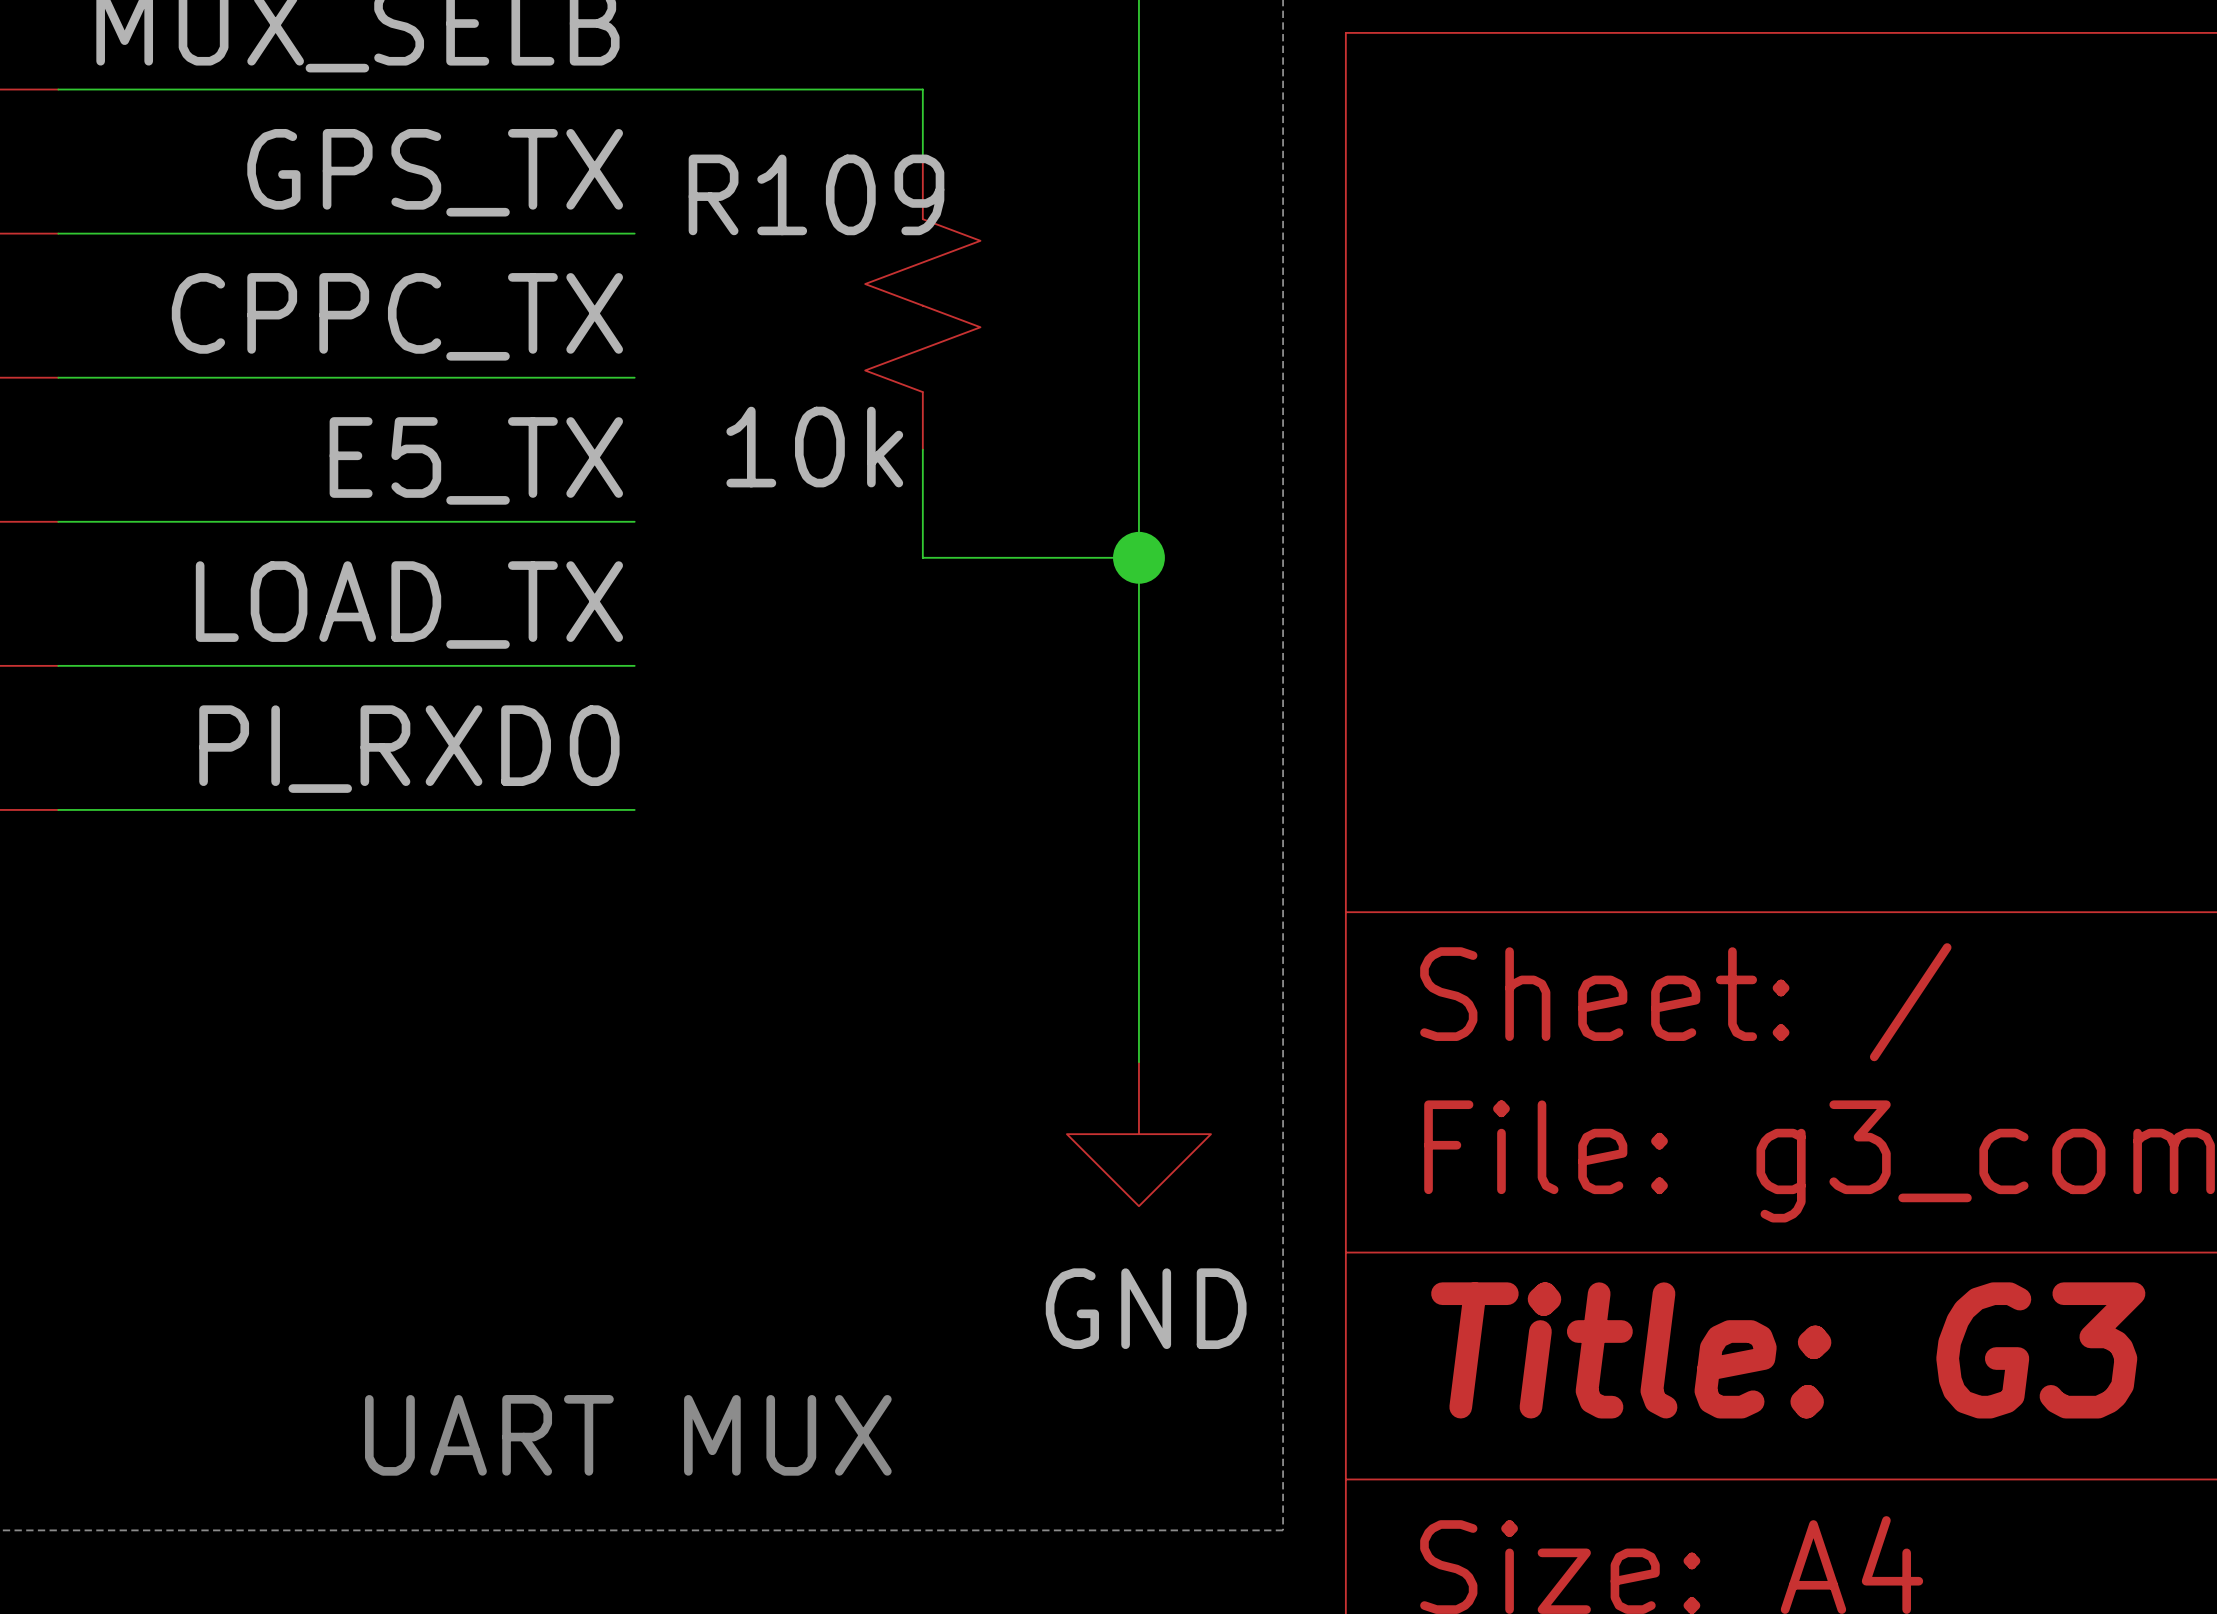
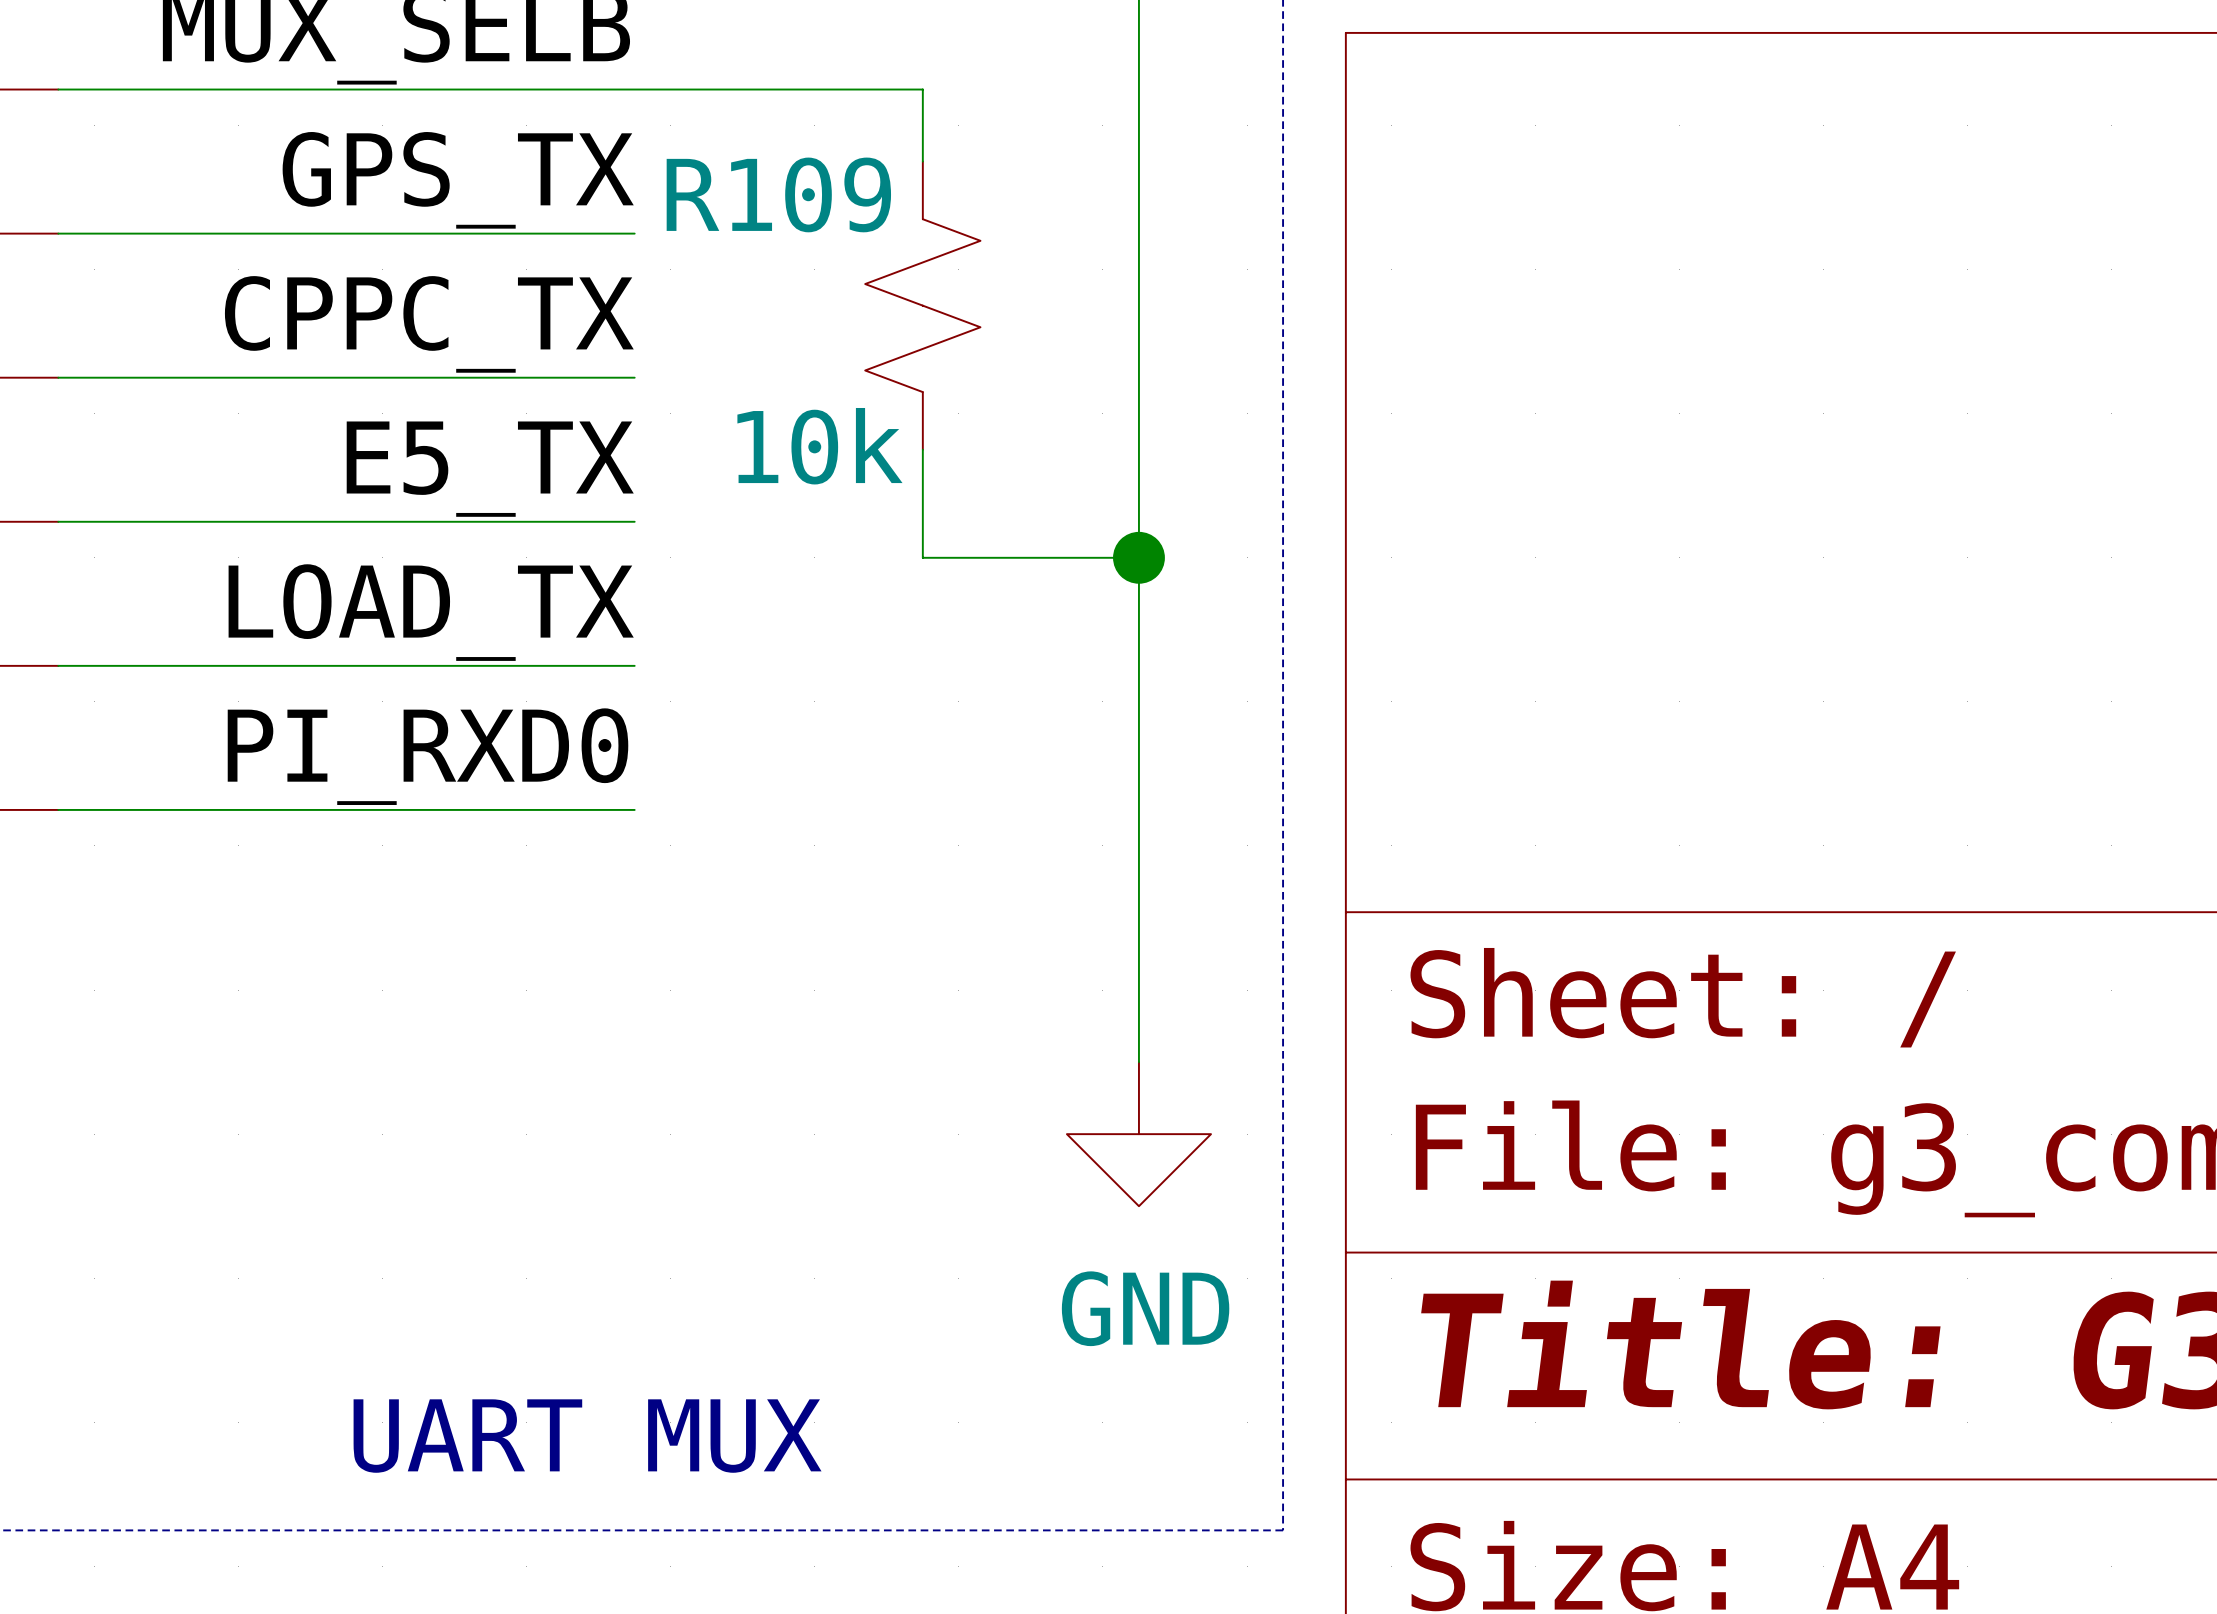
R109 name position: R109 (816, 194) -> R109 (778, 194)

